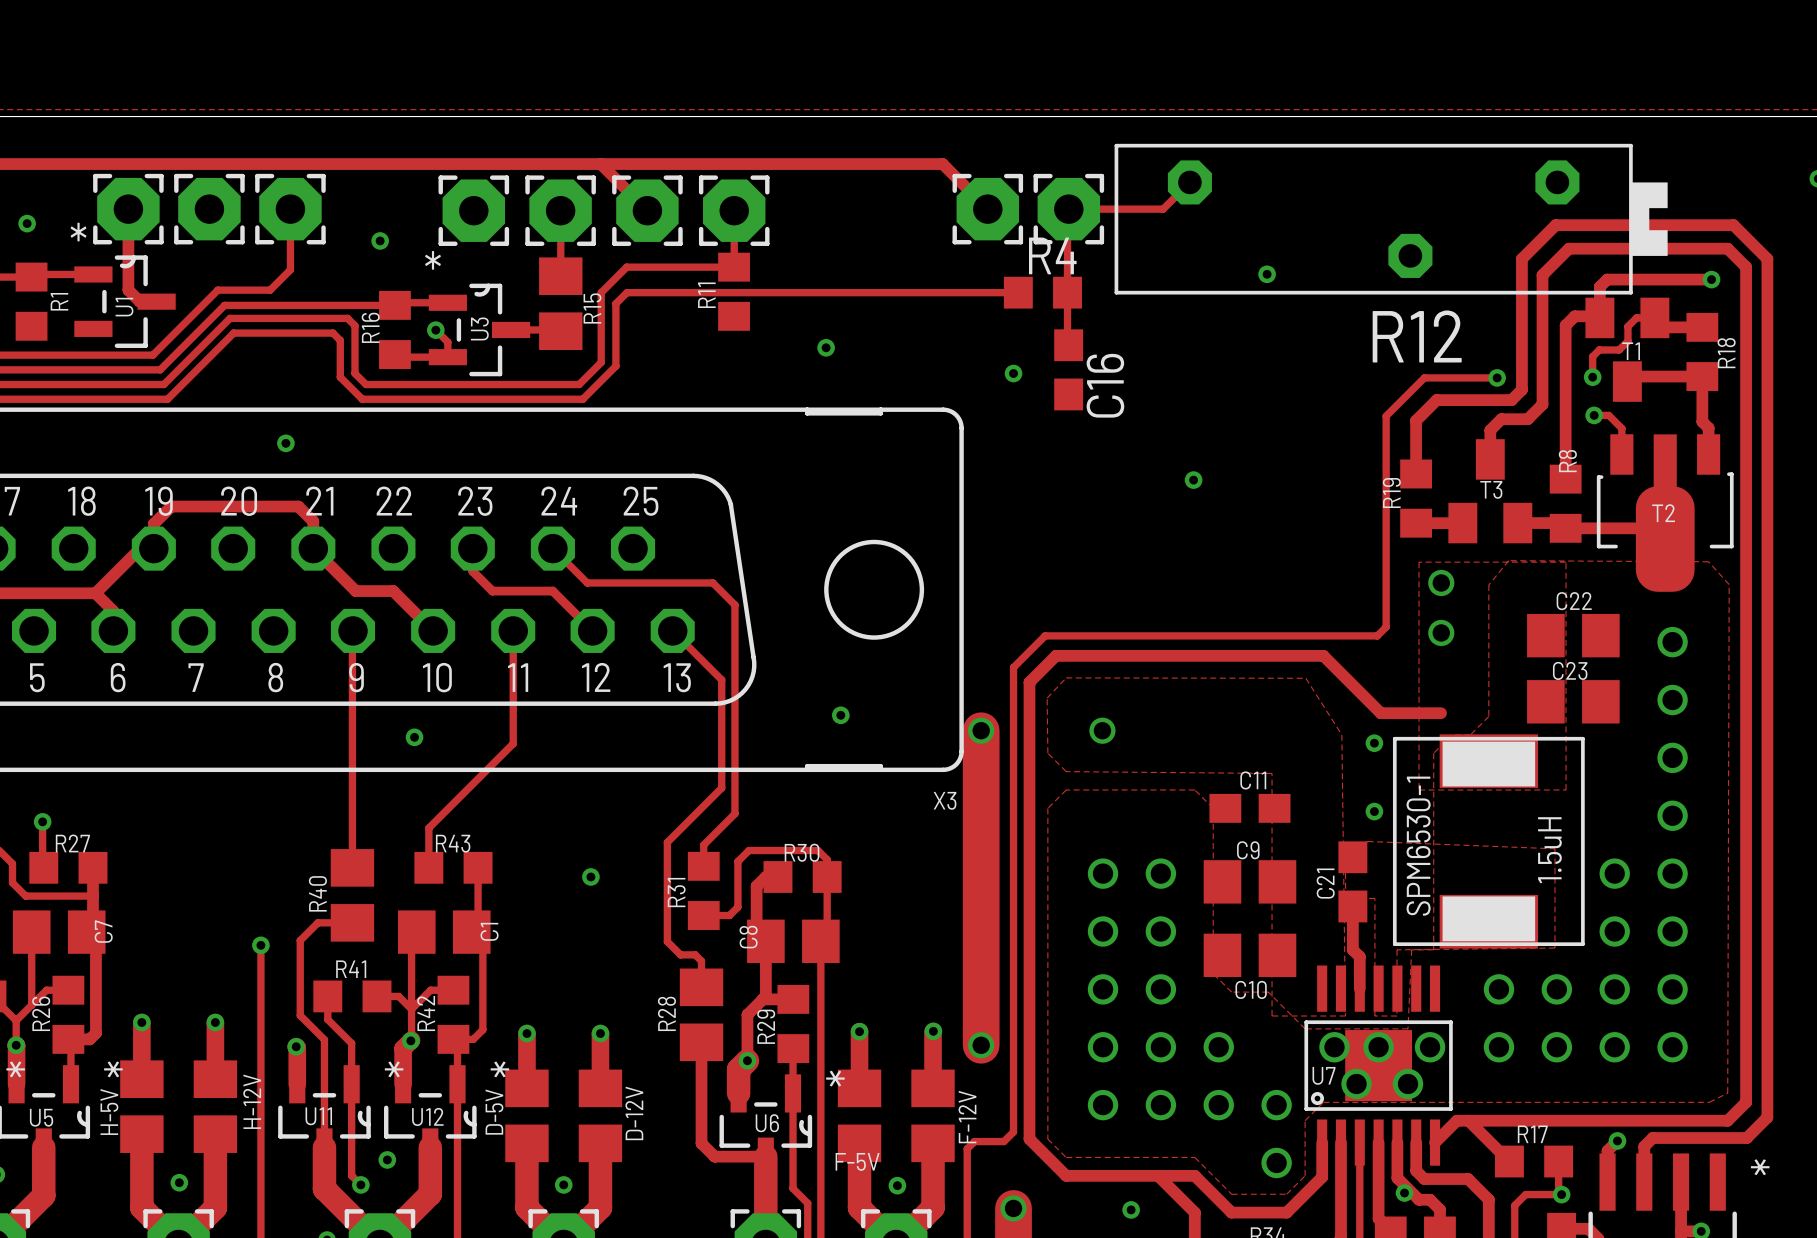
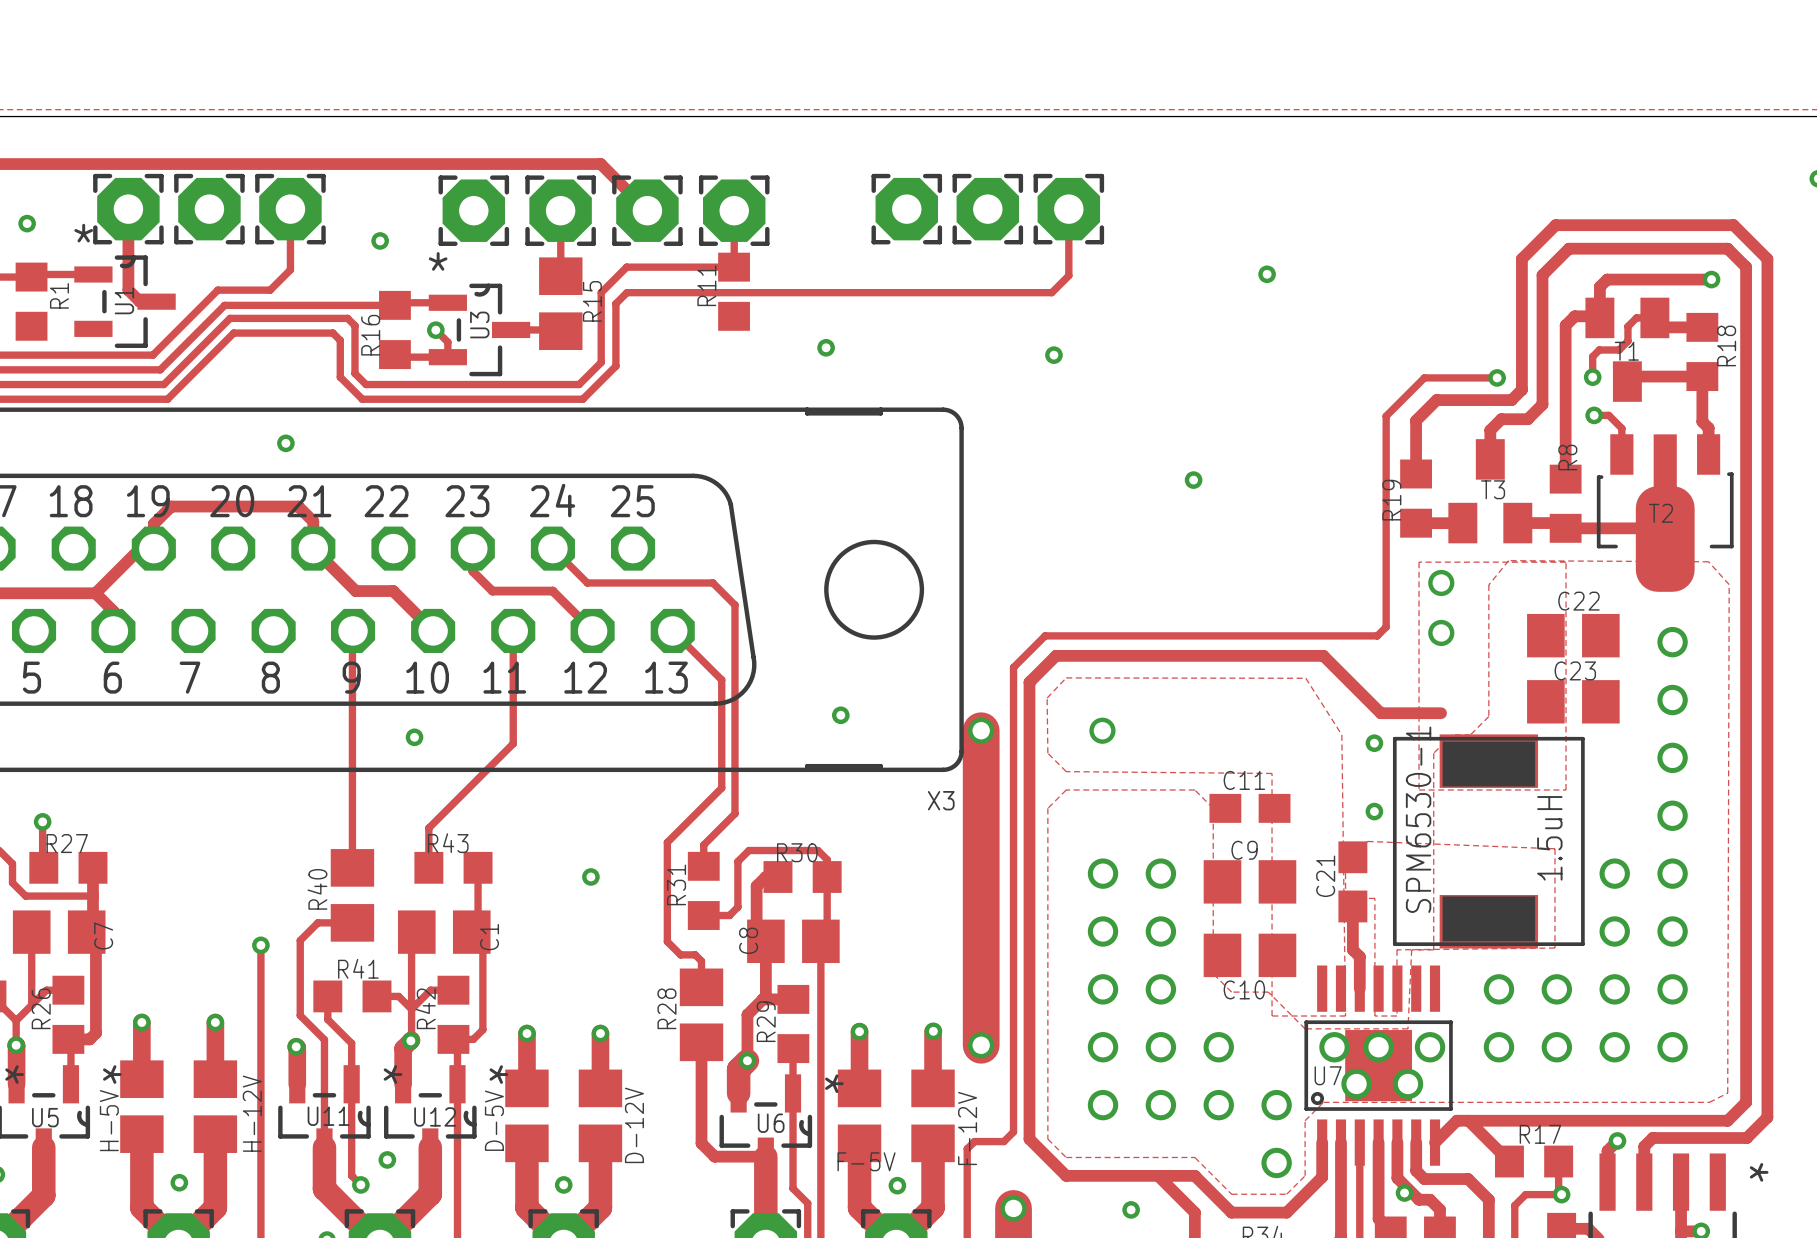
track: (600, 164) (942, 164) (987, 209) -> none
track: (1189, 182) (1163, 209) (1067, 210) (1068, 345) -> none
part: none -> (906, 209)
track: none -> (1068, 209) (1068, 275) (1051, 292) (1018, 292)
R12: (1391, 219) -> none
R4: (1042, 292) -> none
C16: (1068, 369) -> none
via position: (1013, 373) -> (1053, 355)

